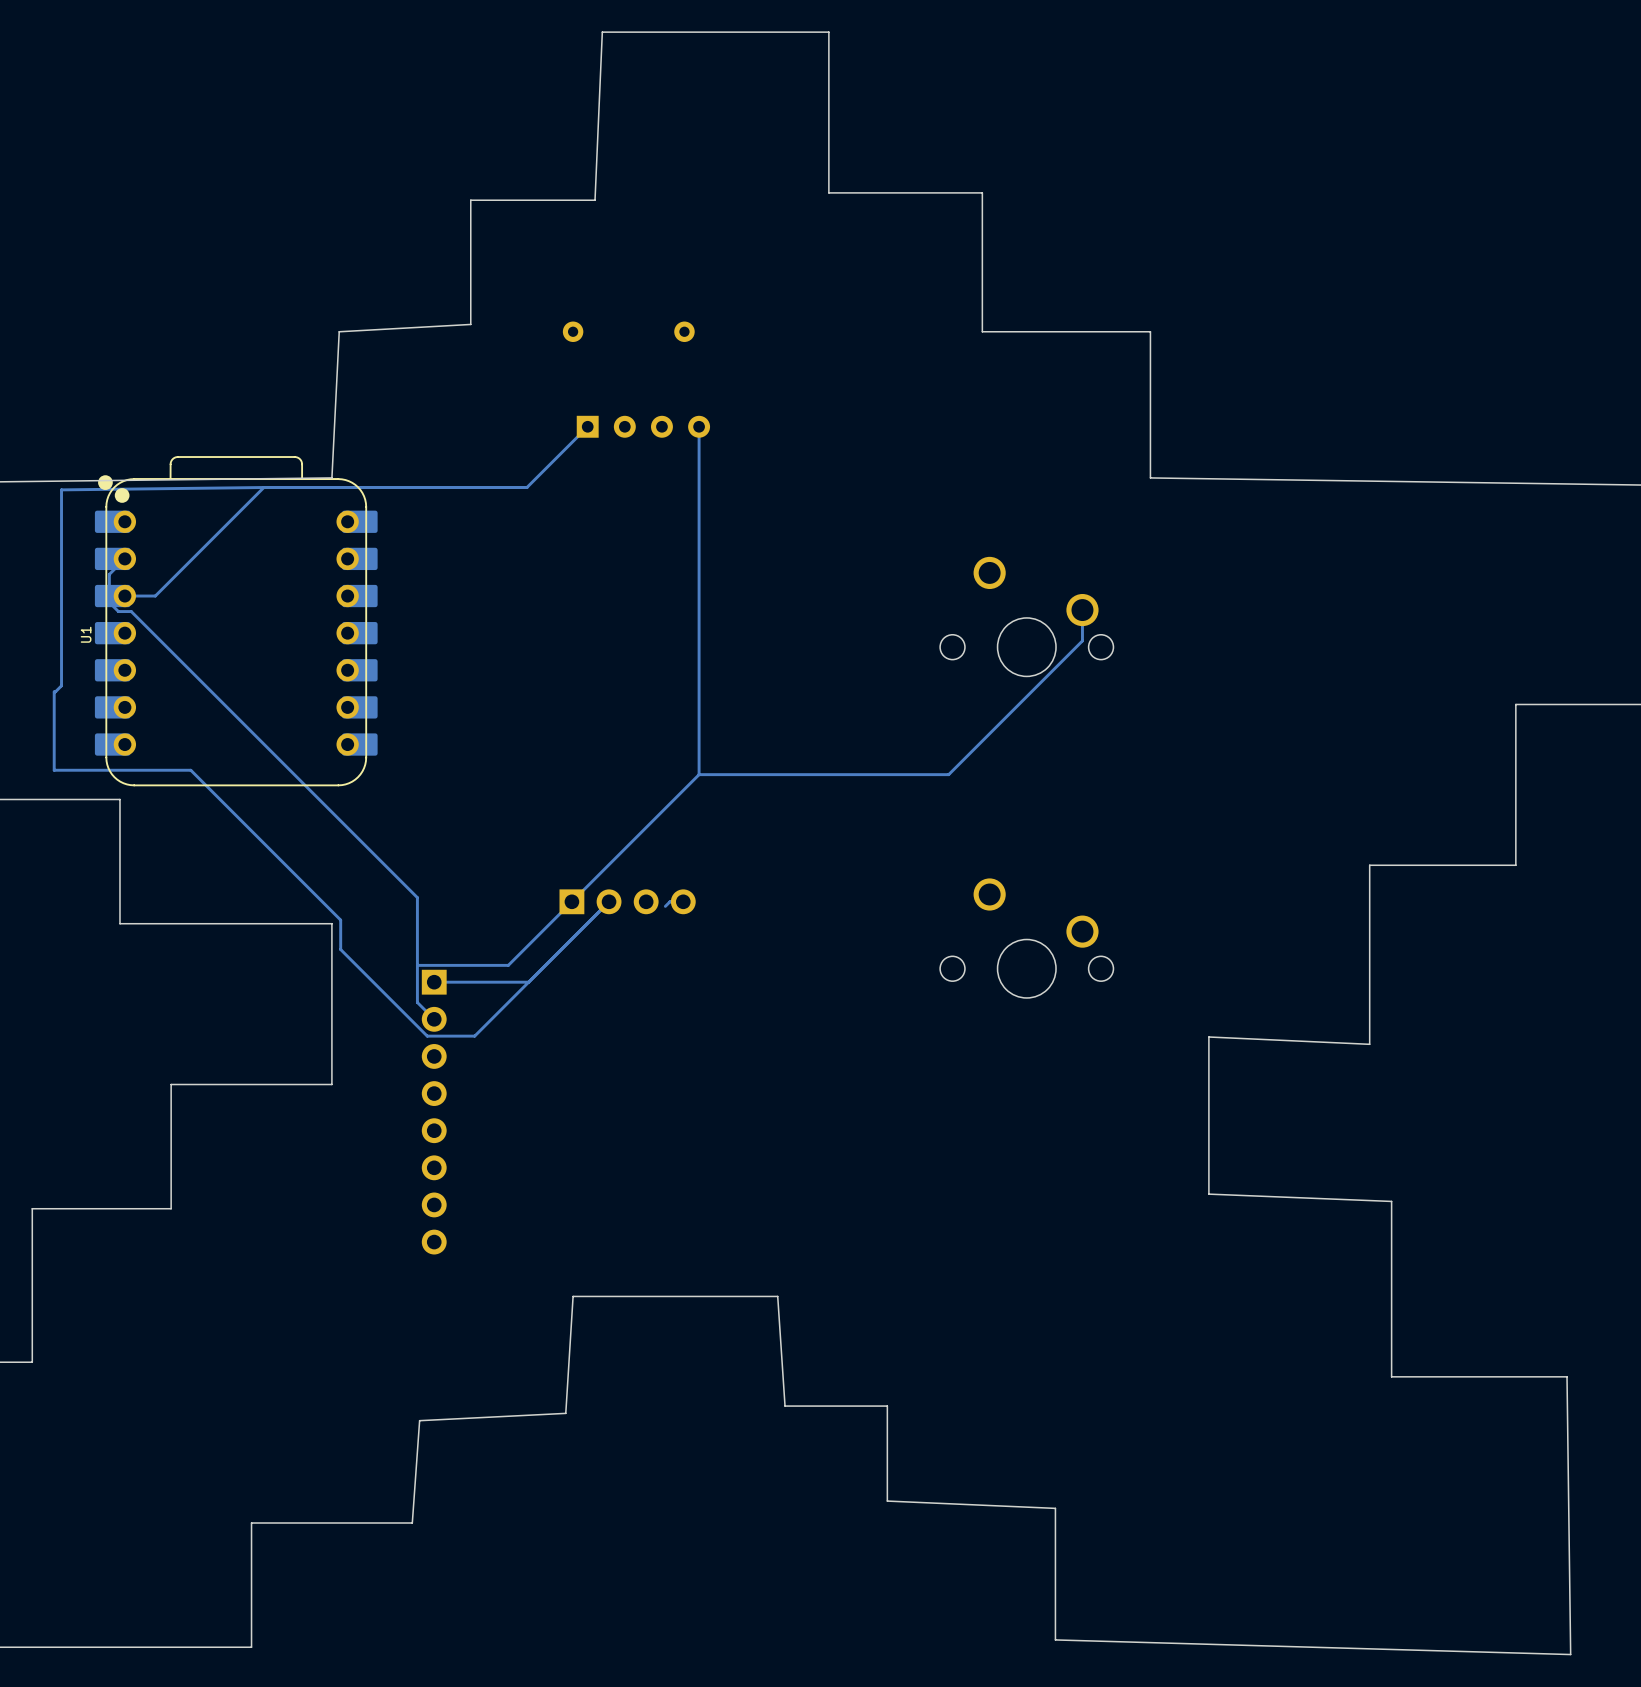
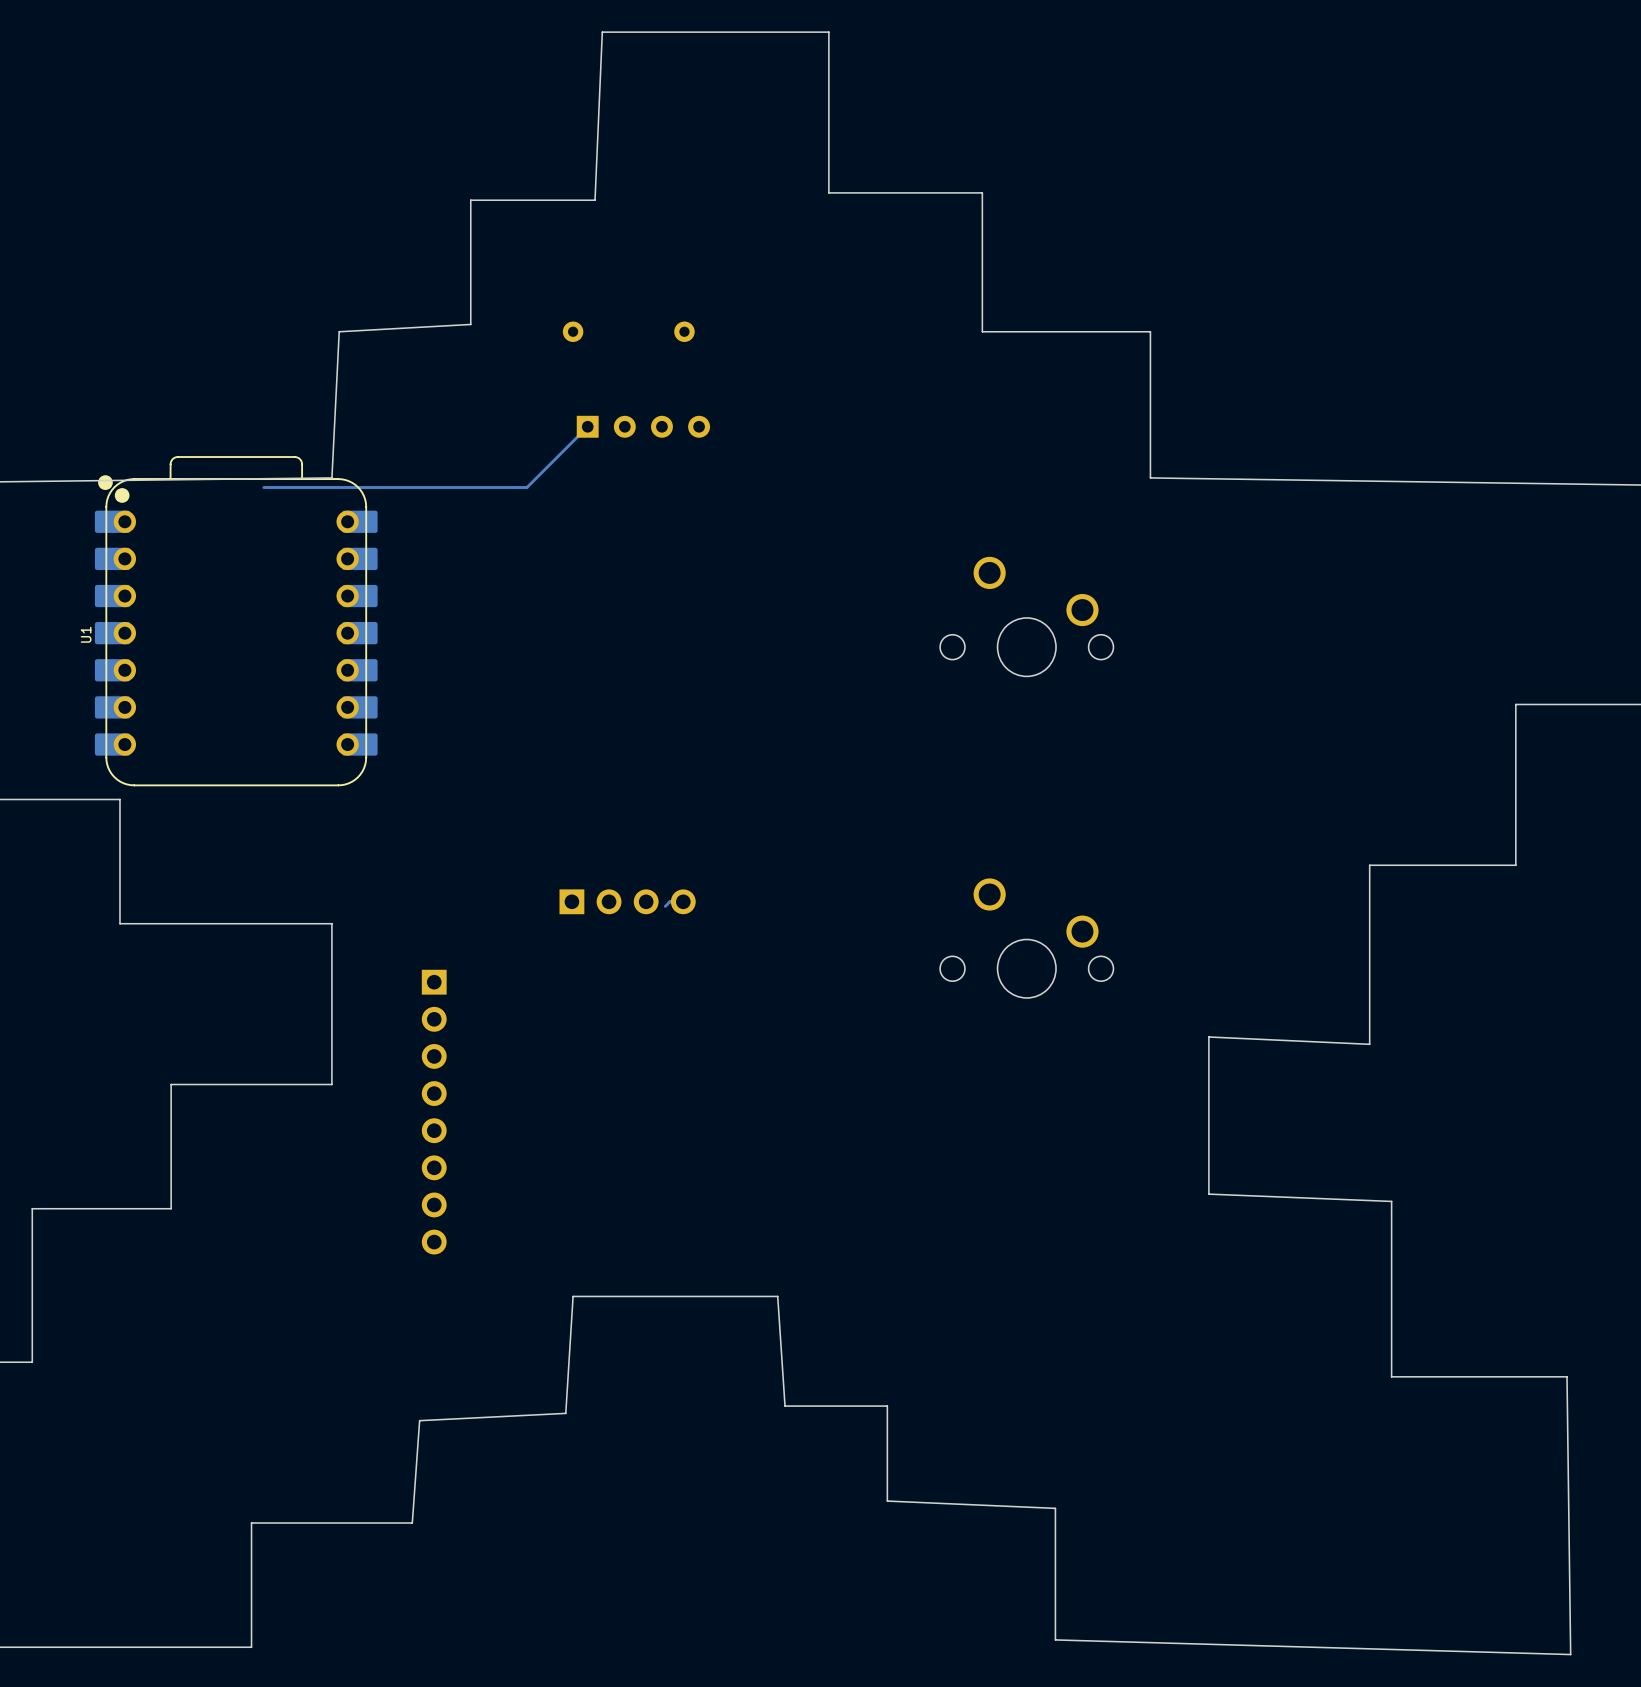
track: (699, 426) (699, 774) -> none
track: (124, 558) (109, 574) (109, 602) (118, 611) (131, 611) (417, 897) (417, 1002) (434, 1019) -> none
track: (124, 596) (155, 596) (263, 487) (61, 489) (61, 685) (54, 691) (54, 770) (190, 770) (340, 920) (340, 949) (427, 1036) (474, 1036) (609, 901) -> none
track: (1082, 610) (1082, 640) (948, 774) (699, 774) -> none
track: (699, 774) (508, 965) (417, 965) -> none
track: (528, 982) (434, 982) -> none

